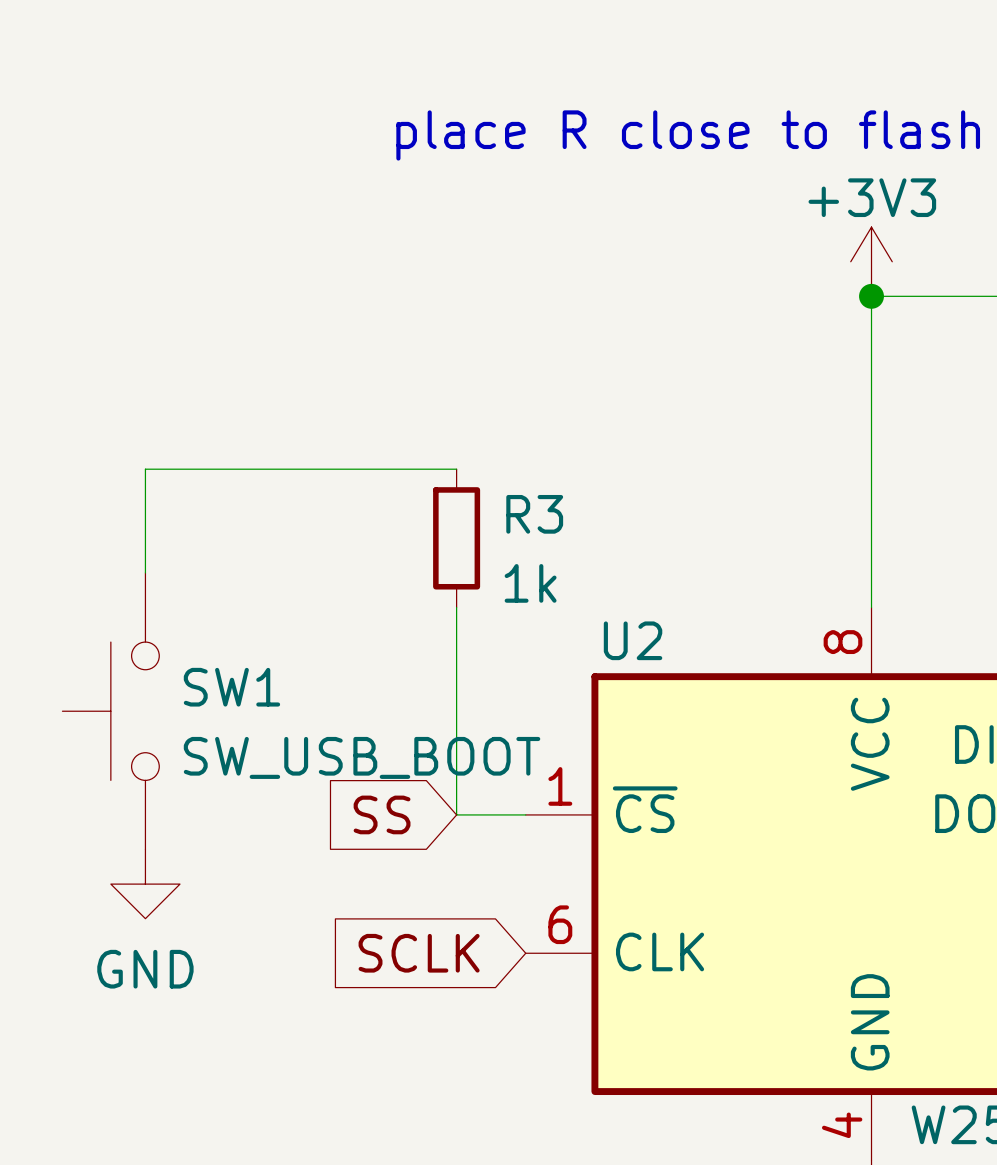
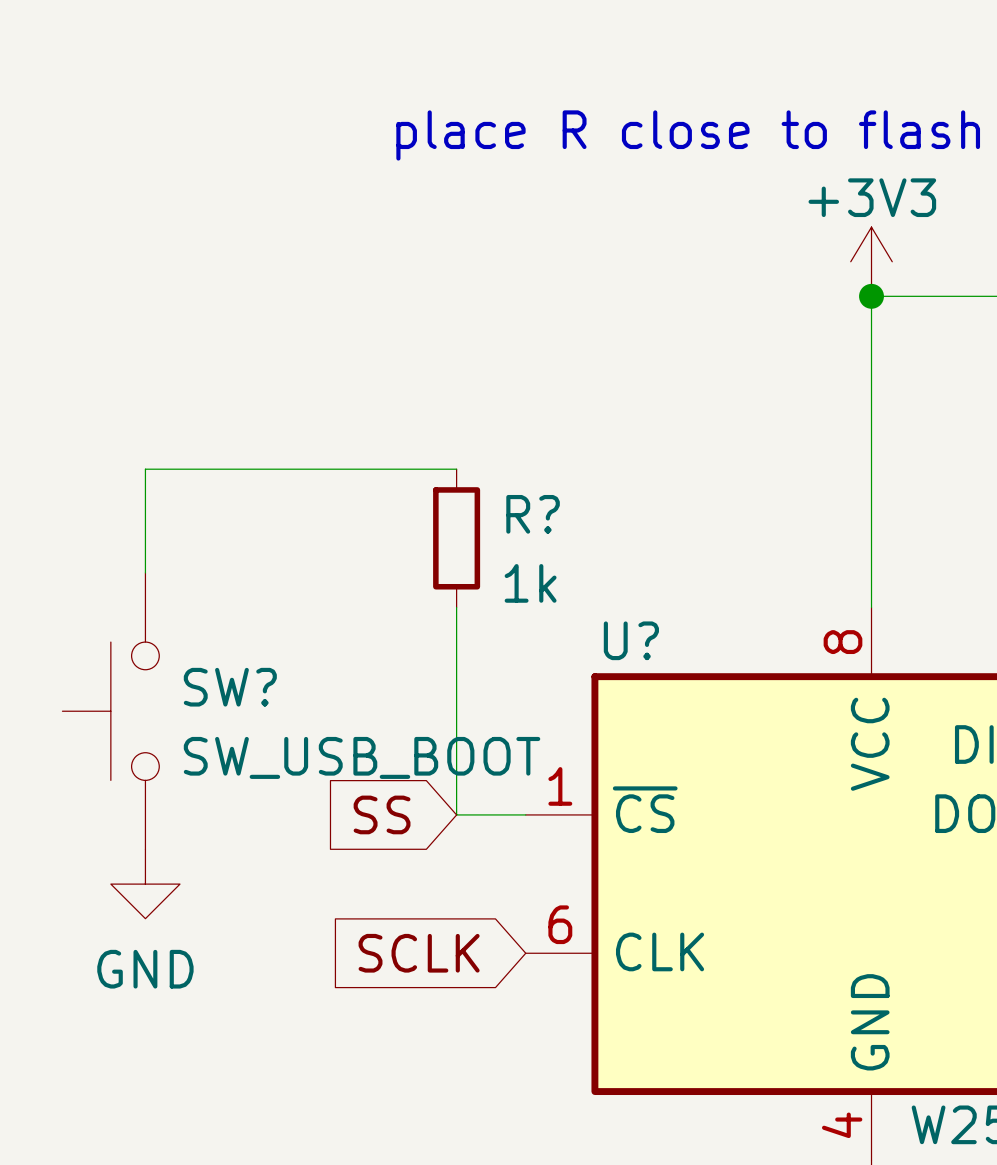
R3 name: R3 (534, 514) -> R? (533, 514)
U2 name: U2 (633, 640) -> U? (631, 640)
SW1 name: SW1 (231, 687) -> SW? (230, 687)

